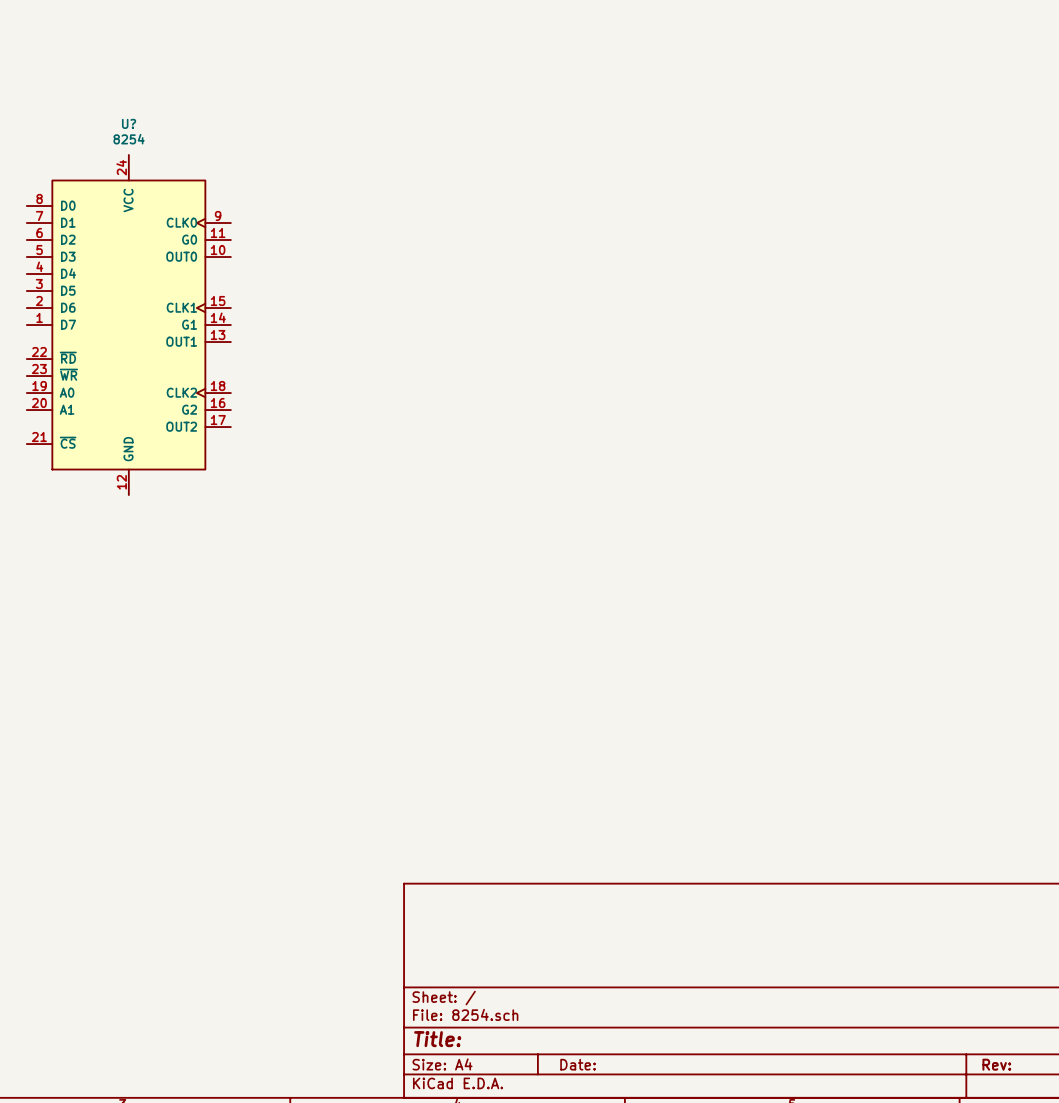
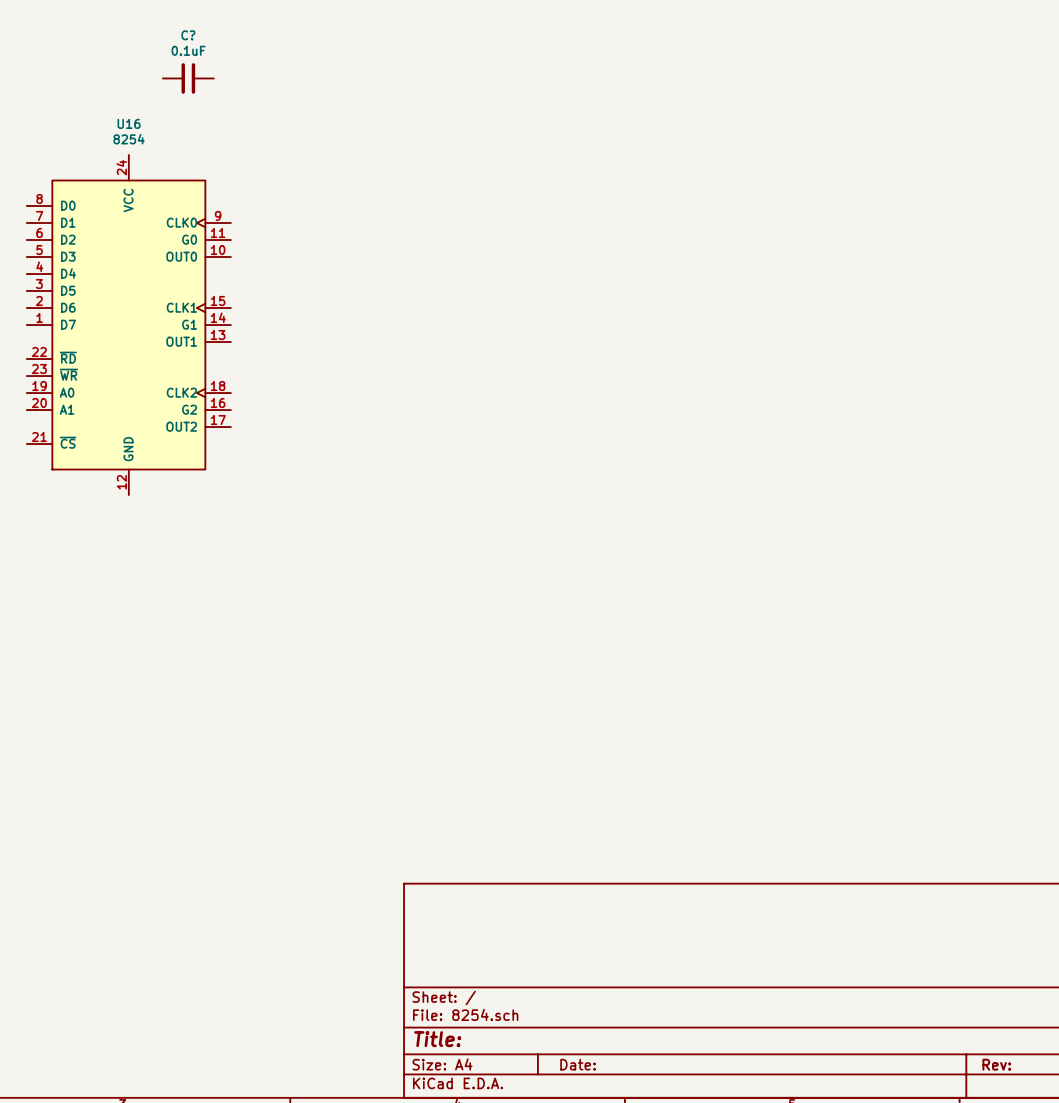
C?: none -> 0.1uF (188, 78)
U? name: U? (129, 123) -> U16 (129, 123)

